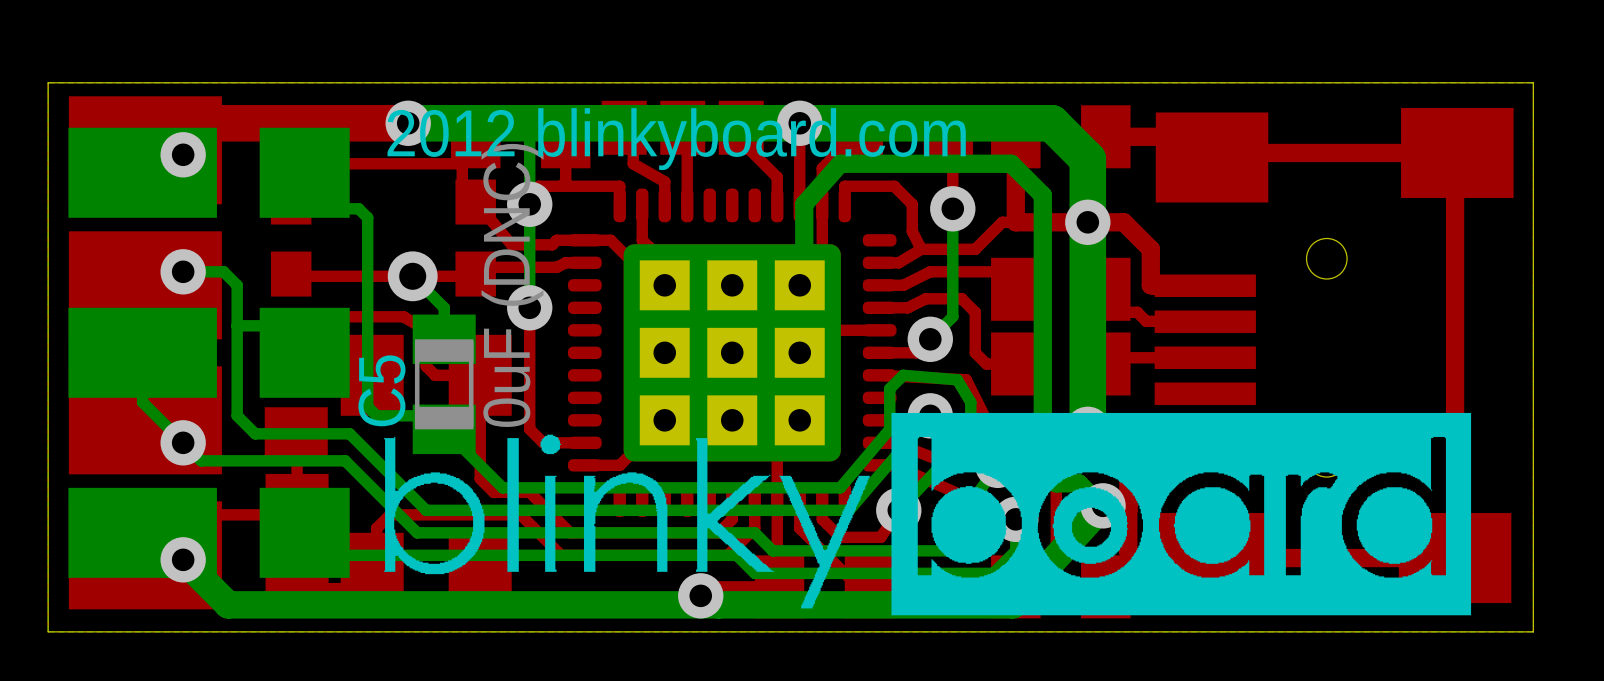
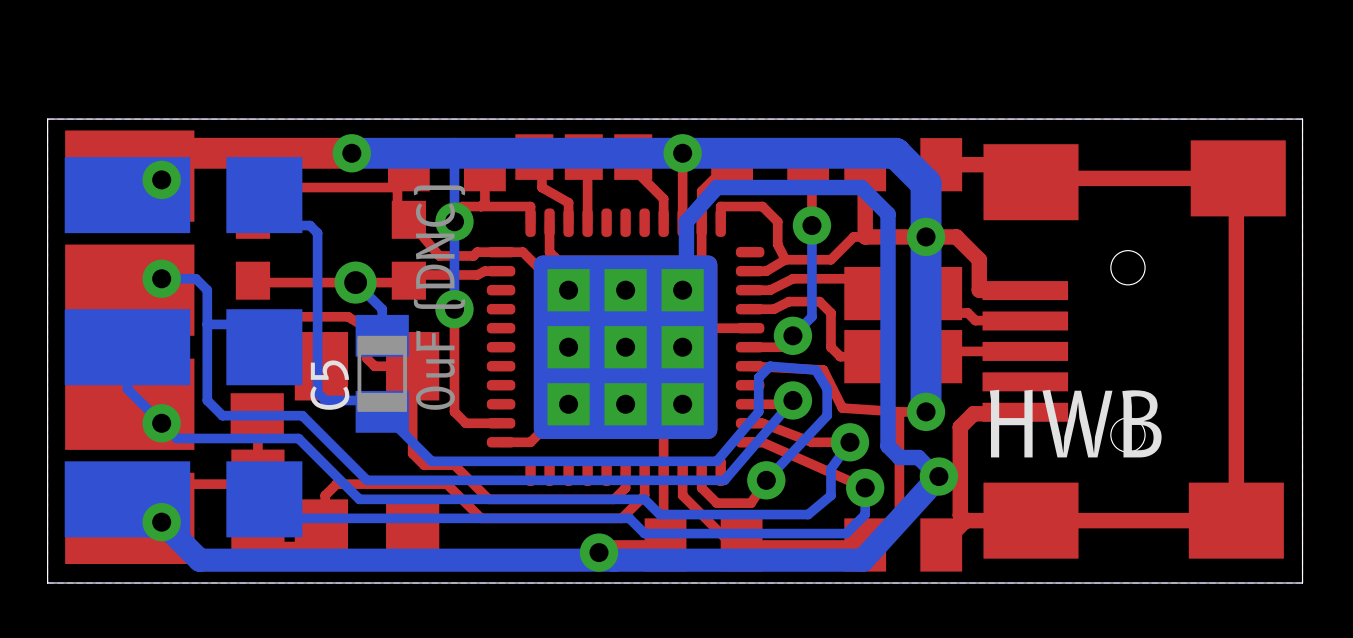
text: 2012 blinkyboard.com (676, 139) -> none
drawing: [383, 412, 1472, 616] -> none
text: none -> HWB (1075, 423)

